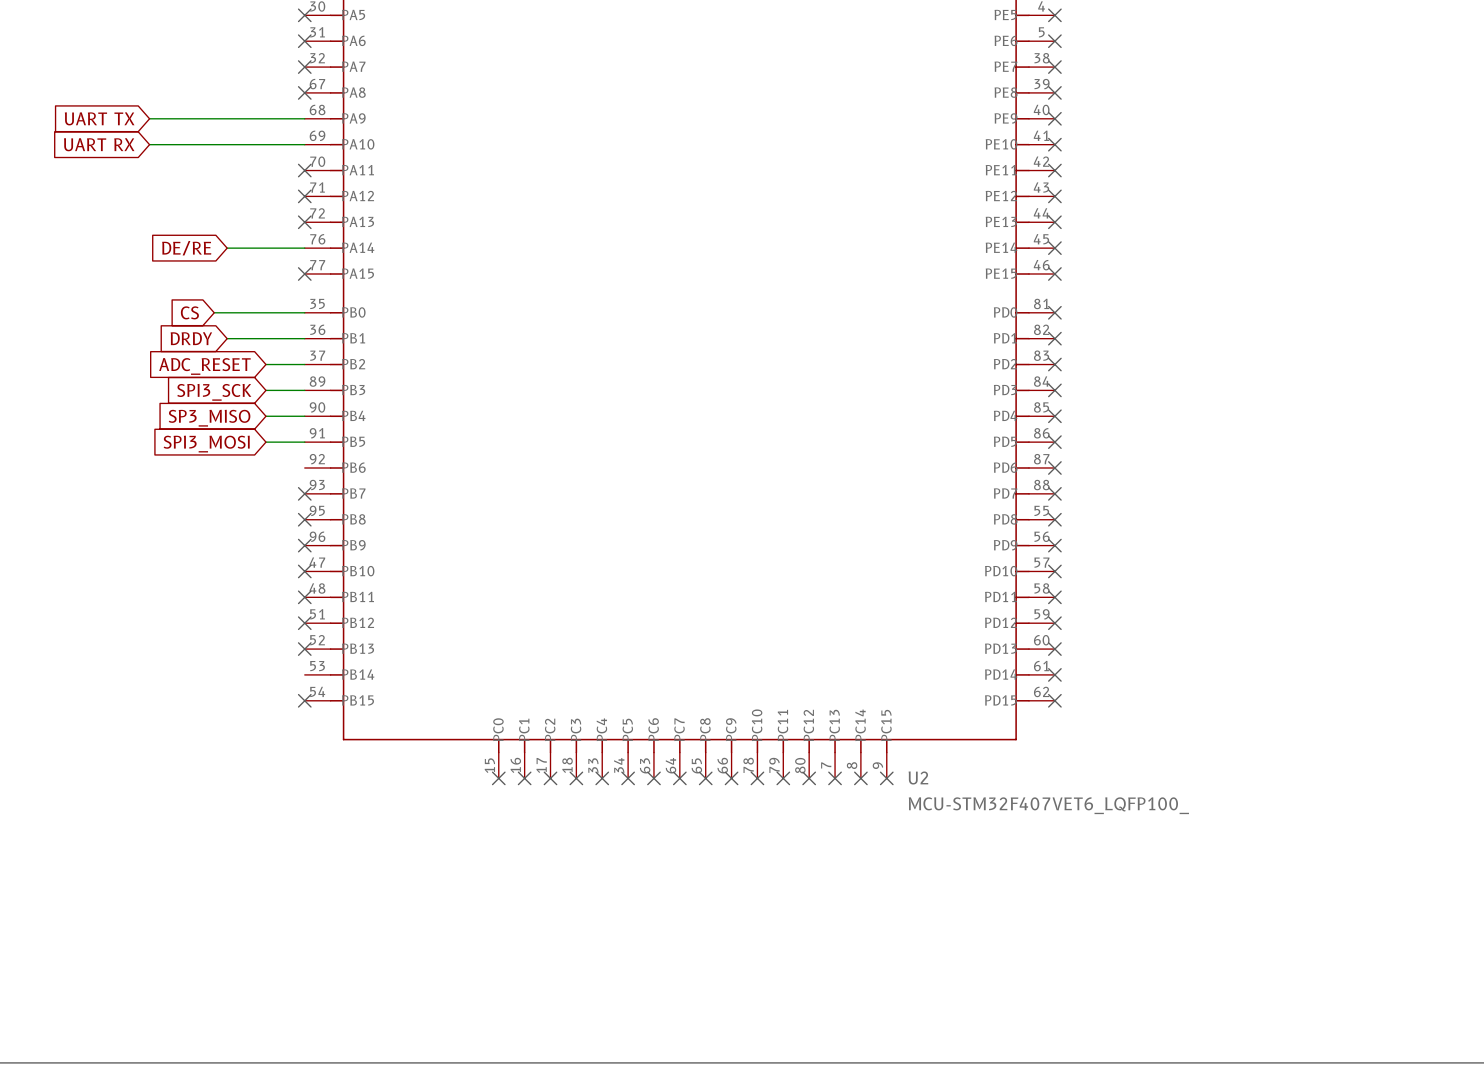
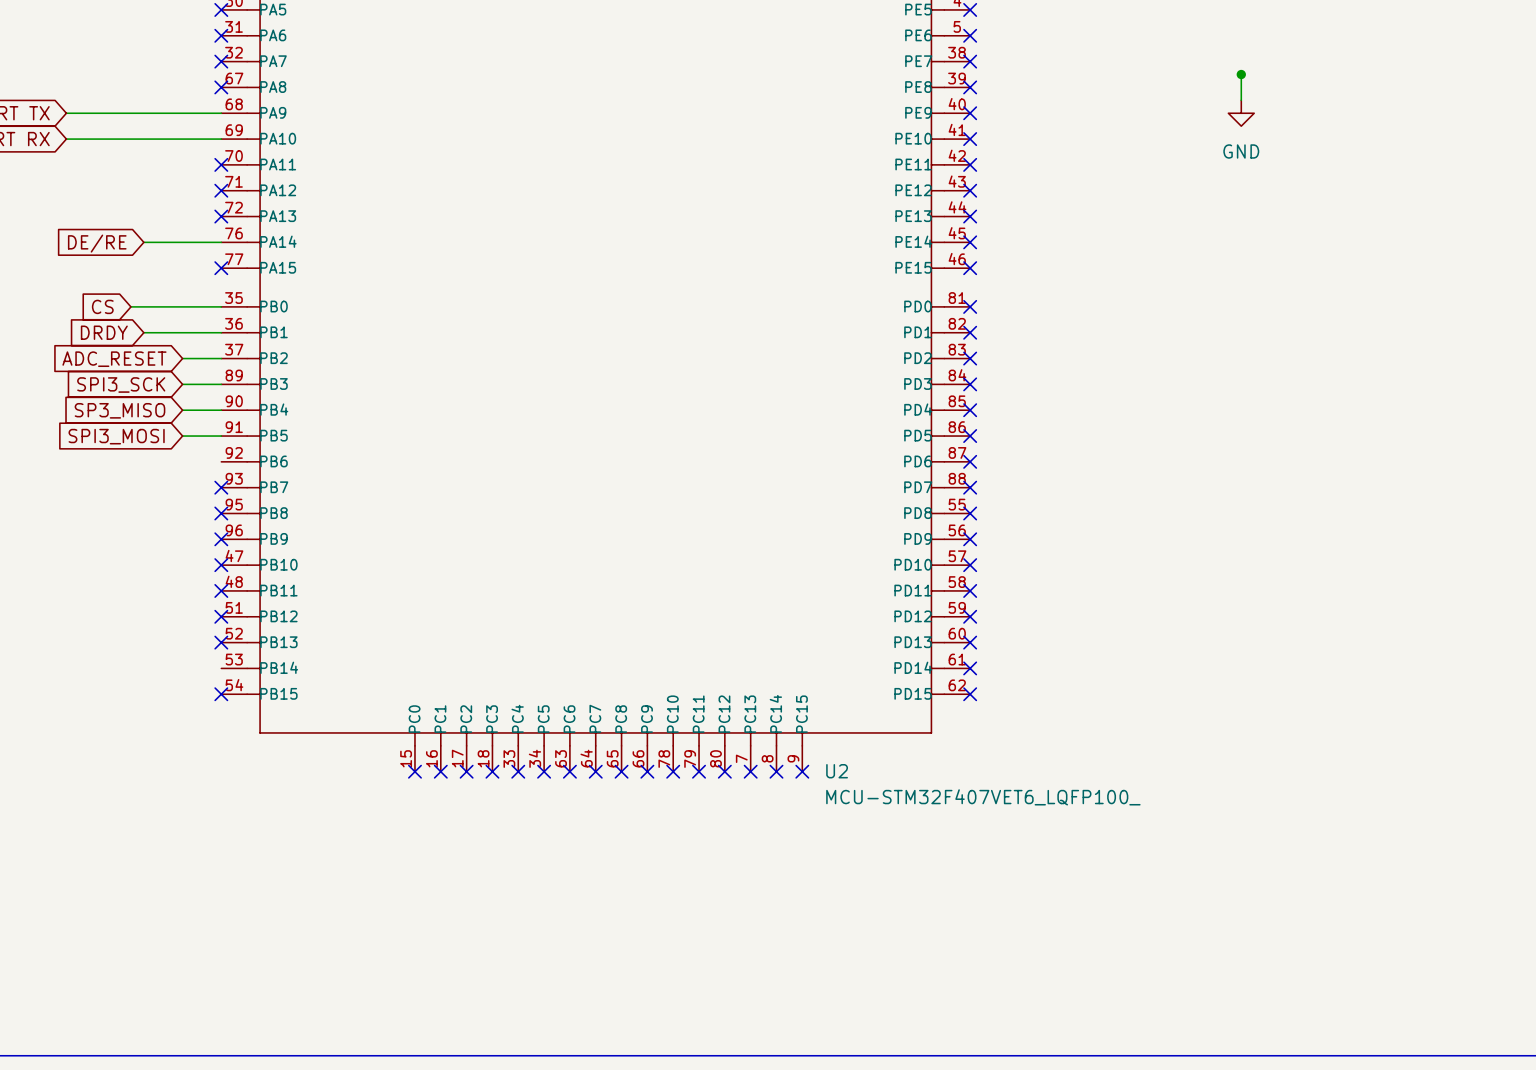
wire: none -> (1241, 74) (1241, 100)
junction: none -> (1241, 74)
power symbol: none -> GND (1241, 113)

